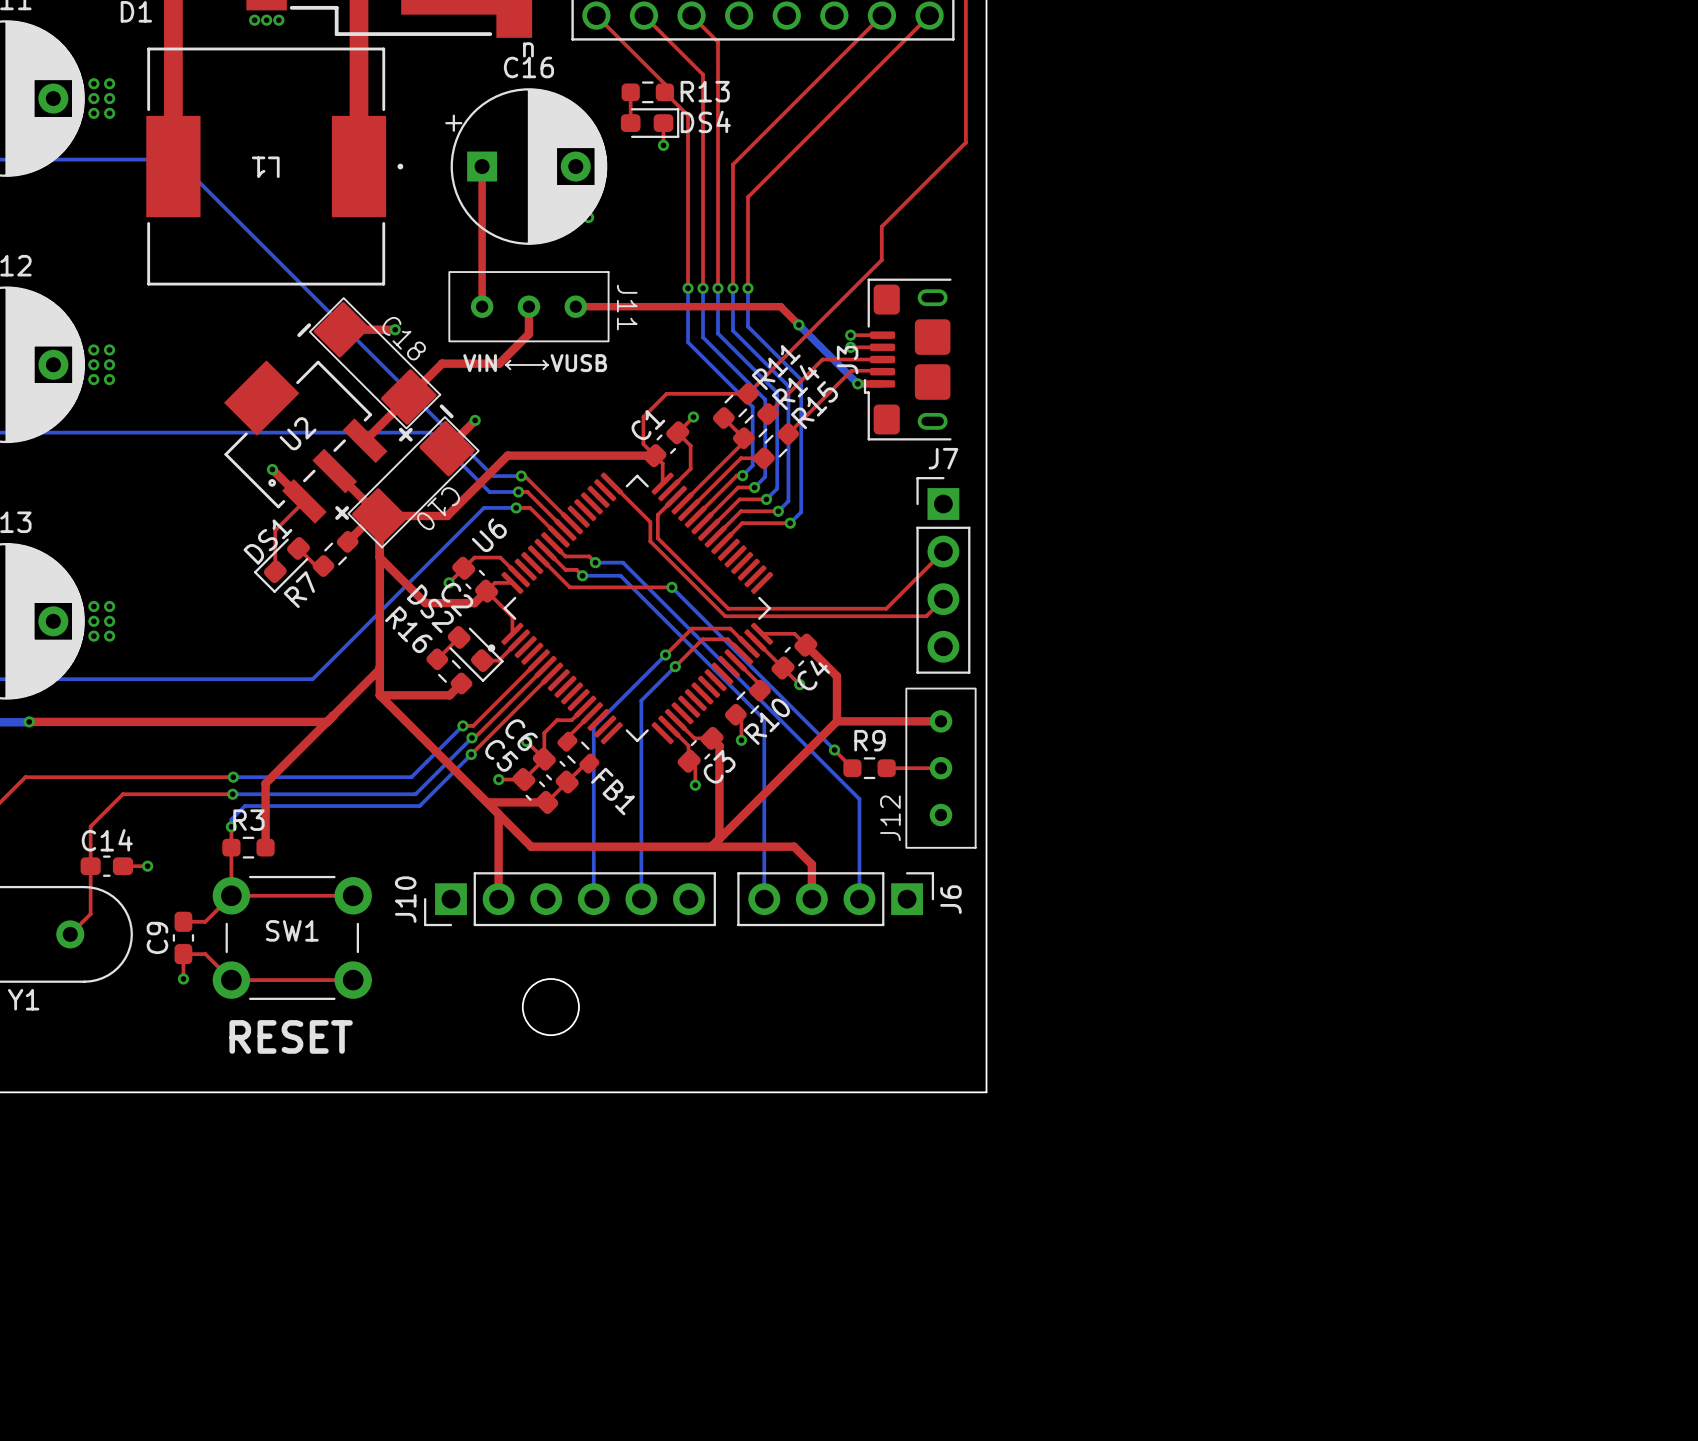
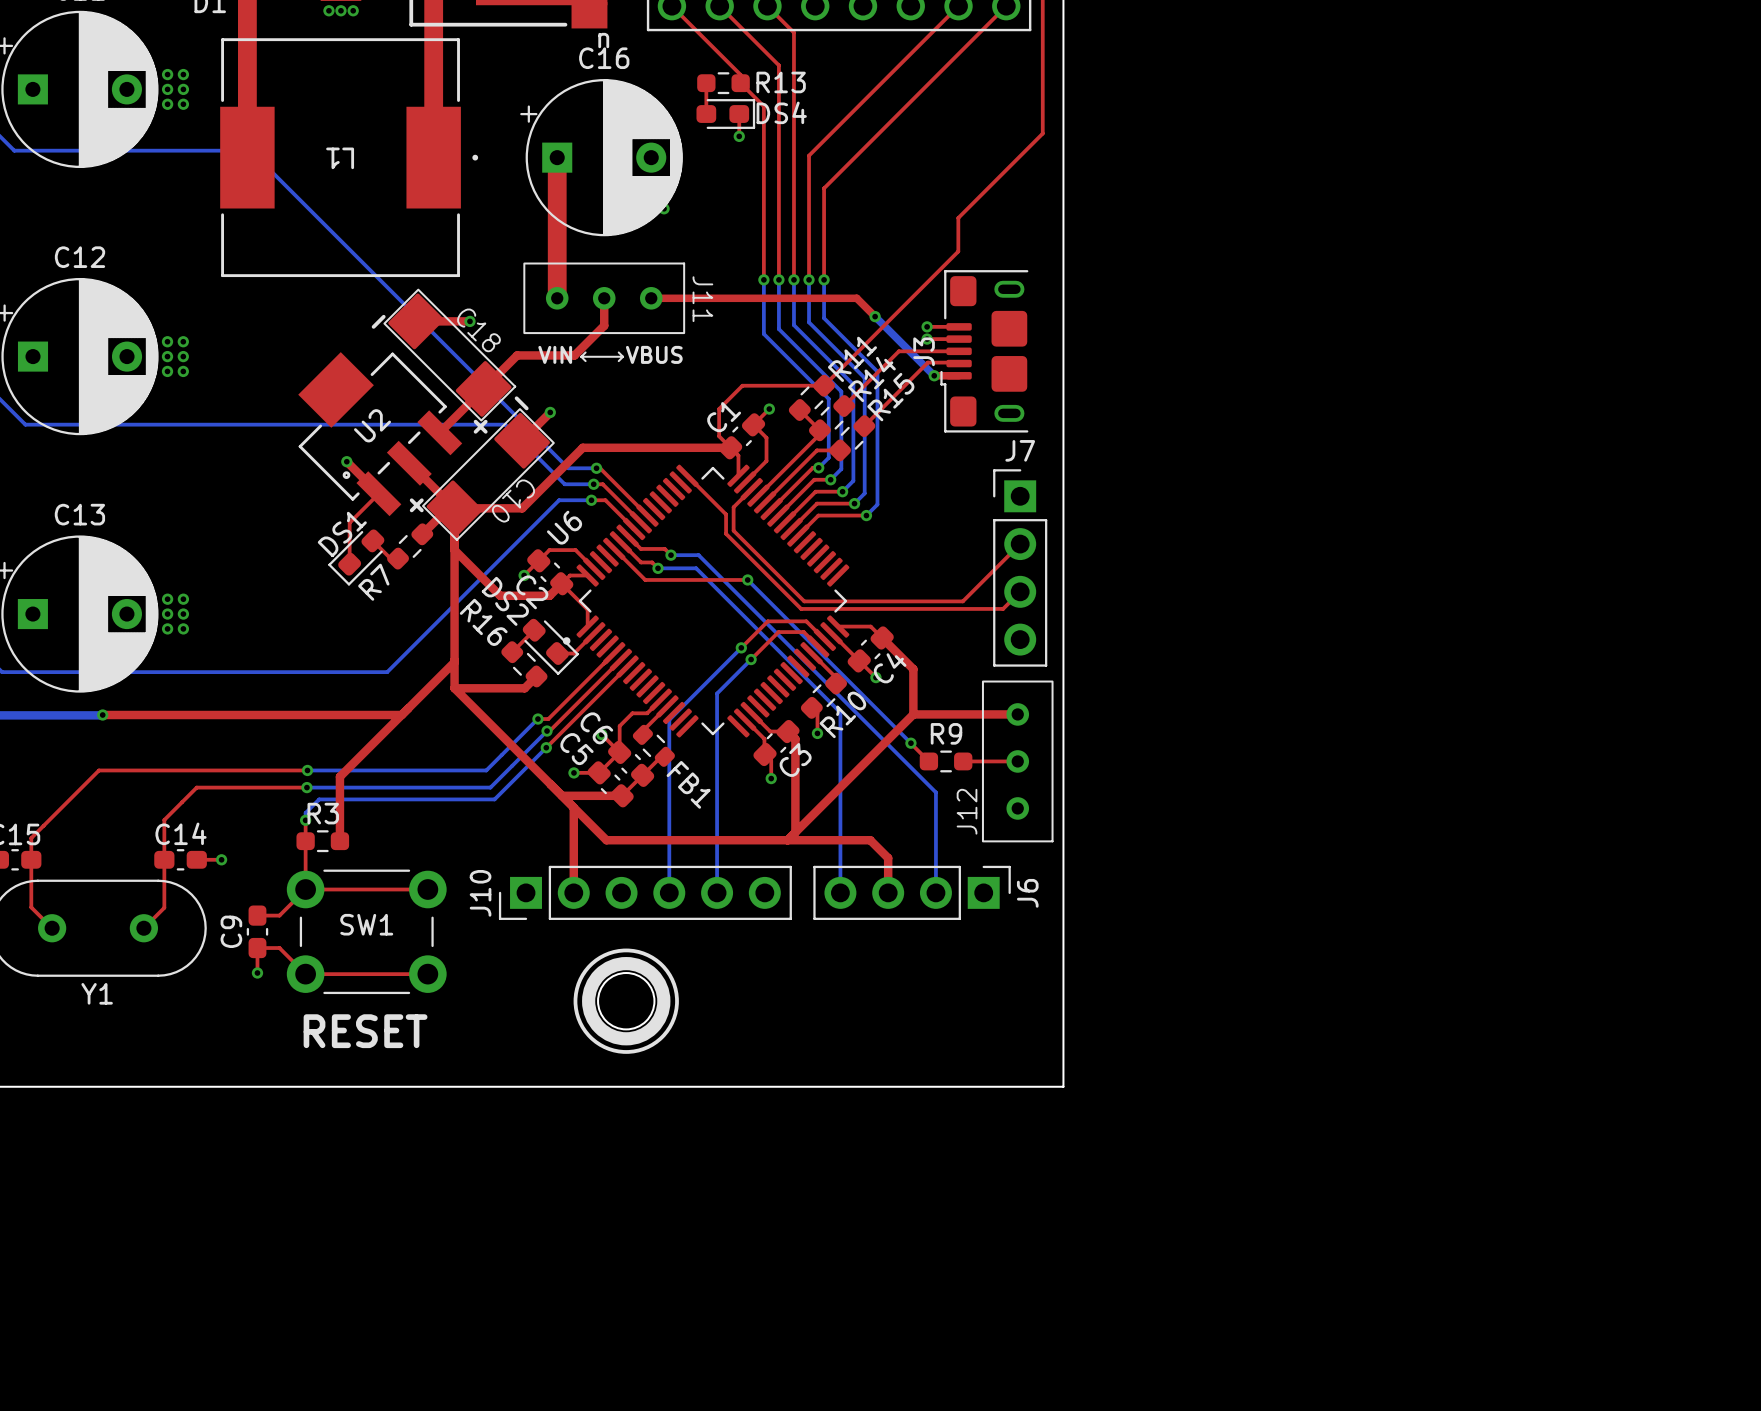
top track width: thin (482, 166) (482, 306) -> thick (557, 157) (557, 298)
text: VUSB (578, 363) -> VBUS (654, 354)
drawing: none -> [573, 948, 679, 1054]

